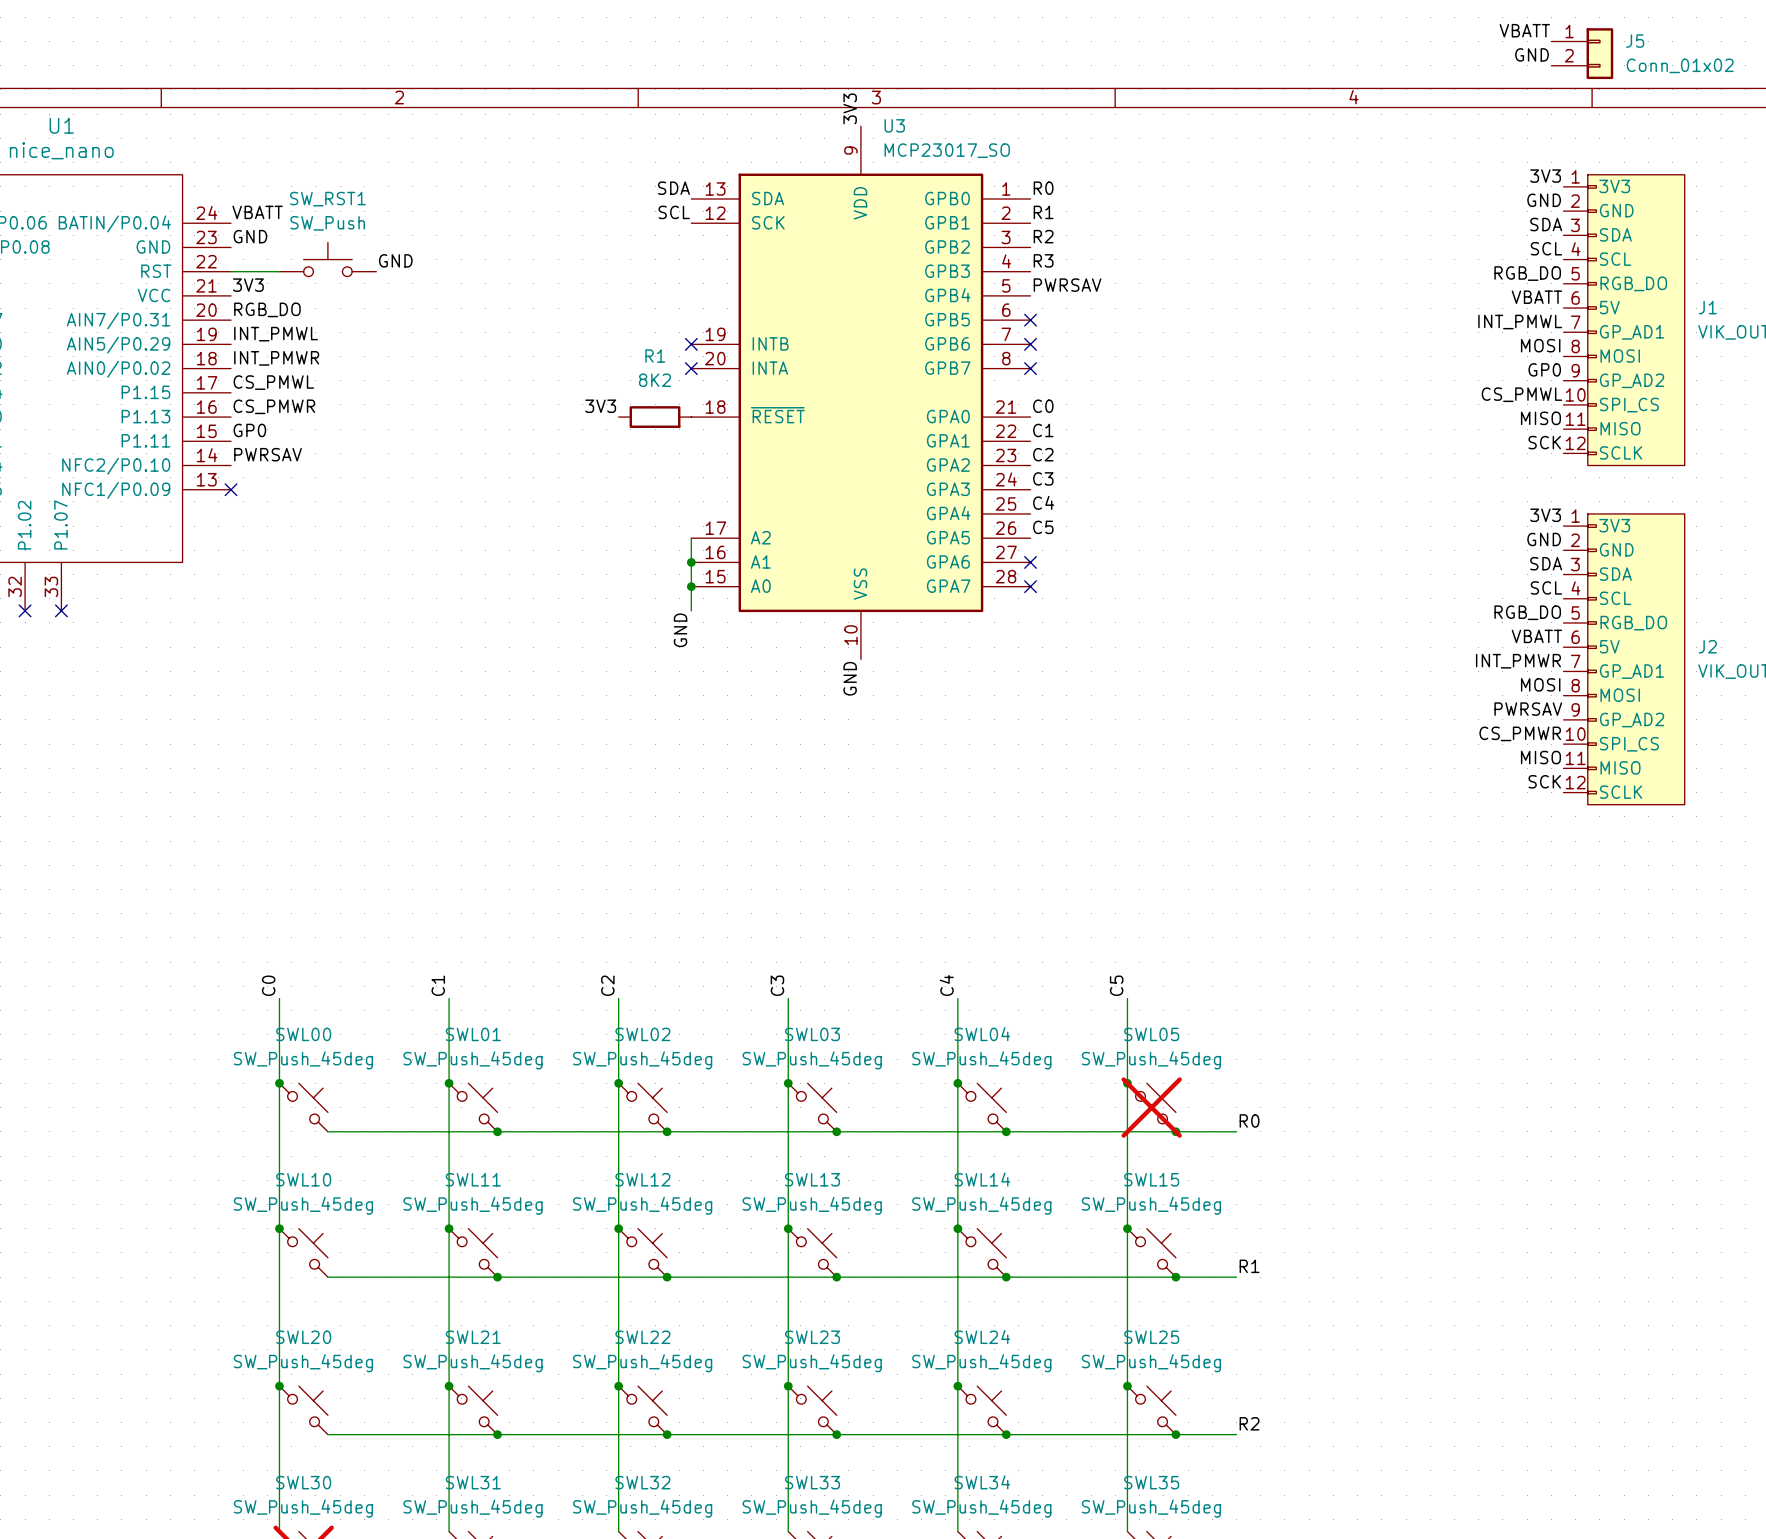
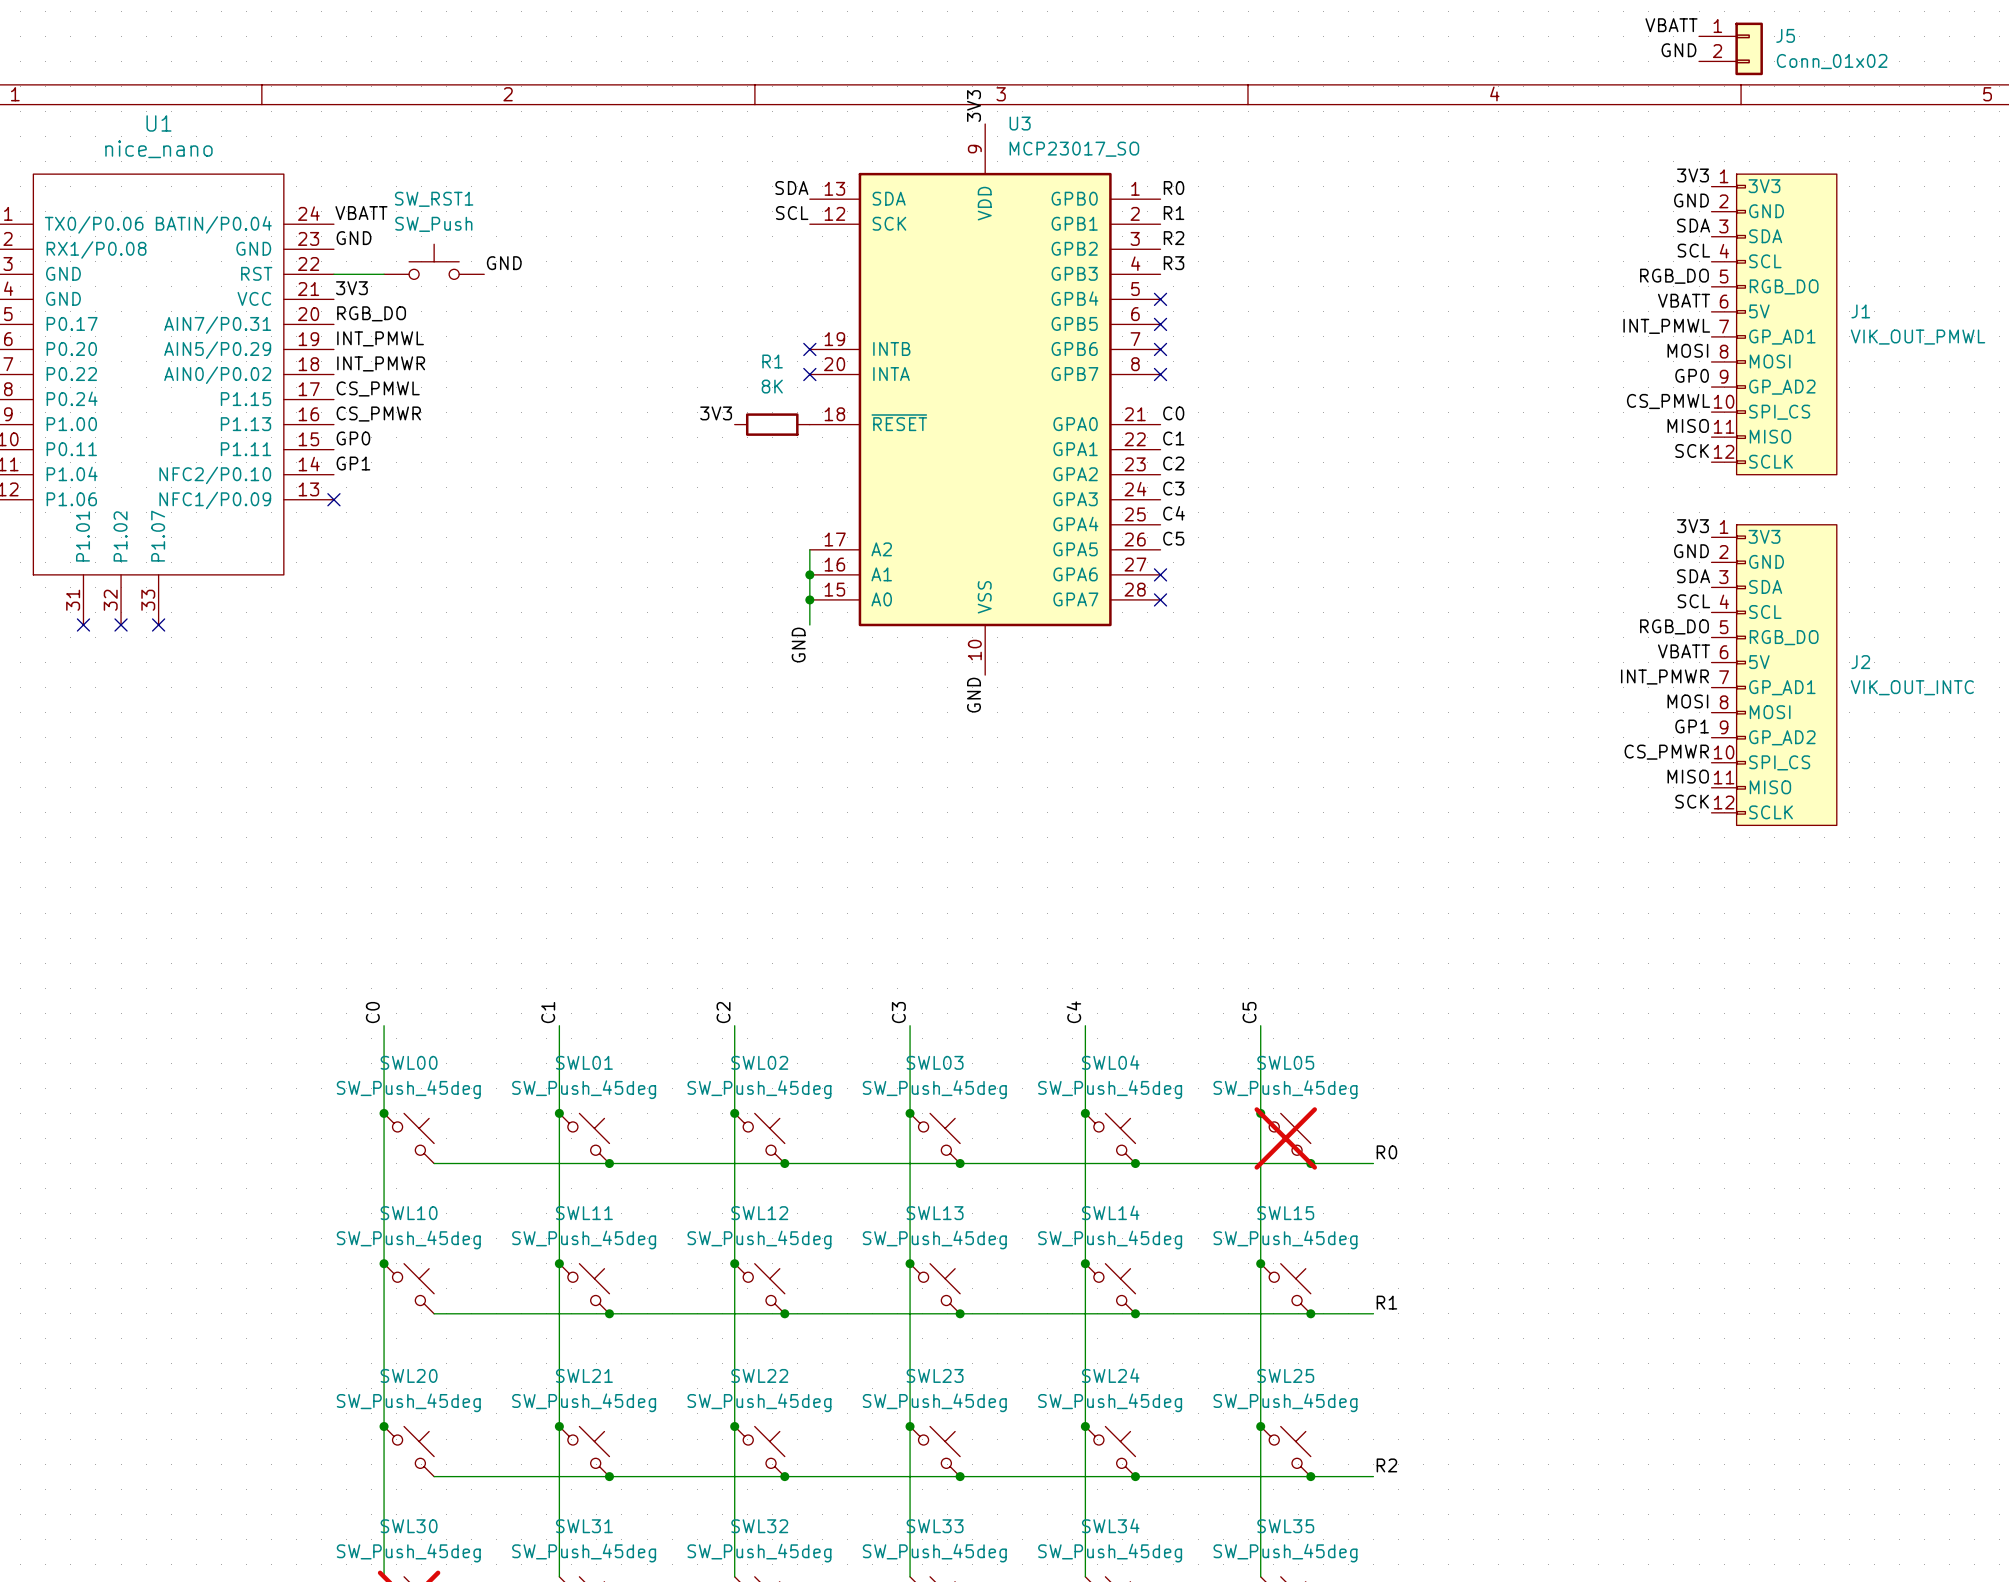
label: PWRSAV (1067, 285) -> none
no-connect mark: none -> (1160, 299)
R1 value: 8K2 (655, 380) -> 8K (772, 386)
label: PWRSAV (268, 454) -> GP1 (353, 463)
label: PWRSAV (1528, 709) -> GP1 (1692, 726)

